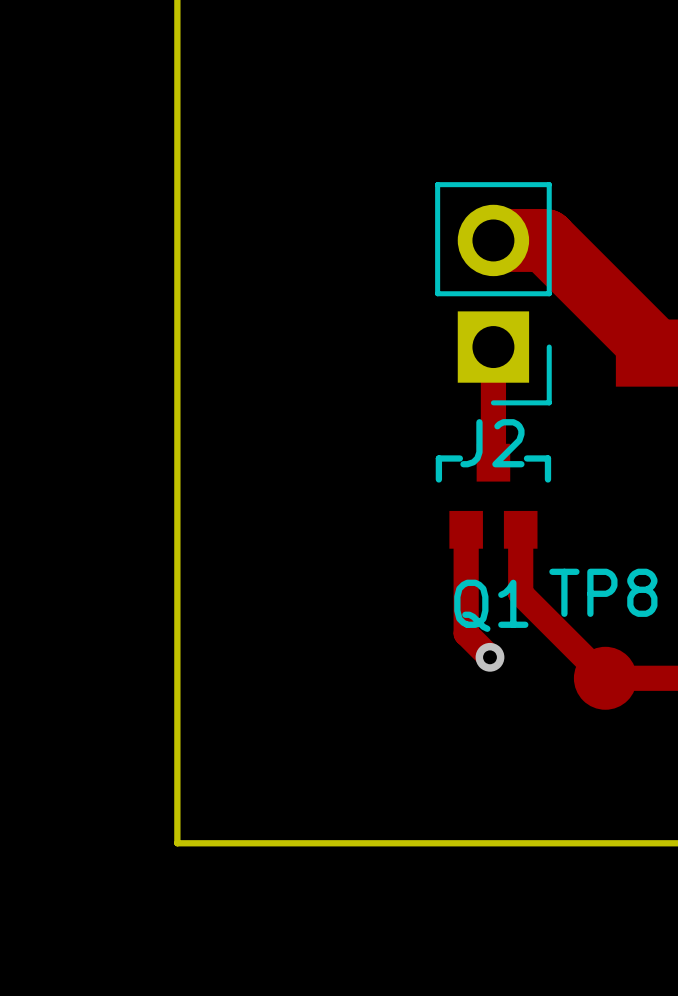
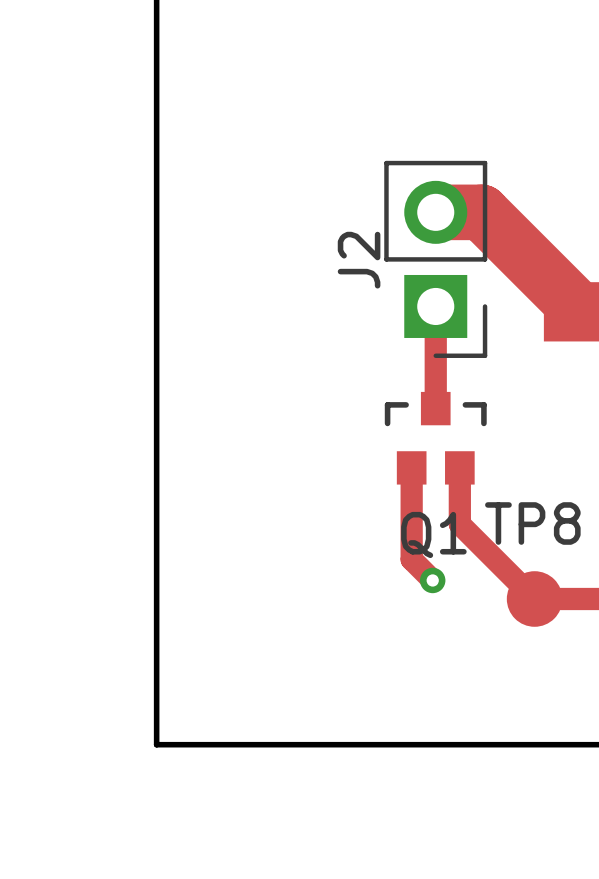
J2 name rotation: 0° (492, 443) -> 90° counterclockwise (359, 260)
J2 name position: J2 (492, 443) -> J2 (359, 260)

